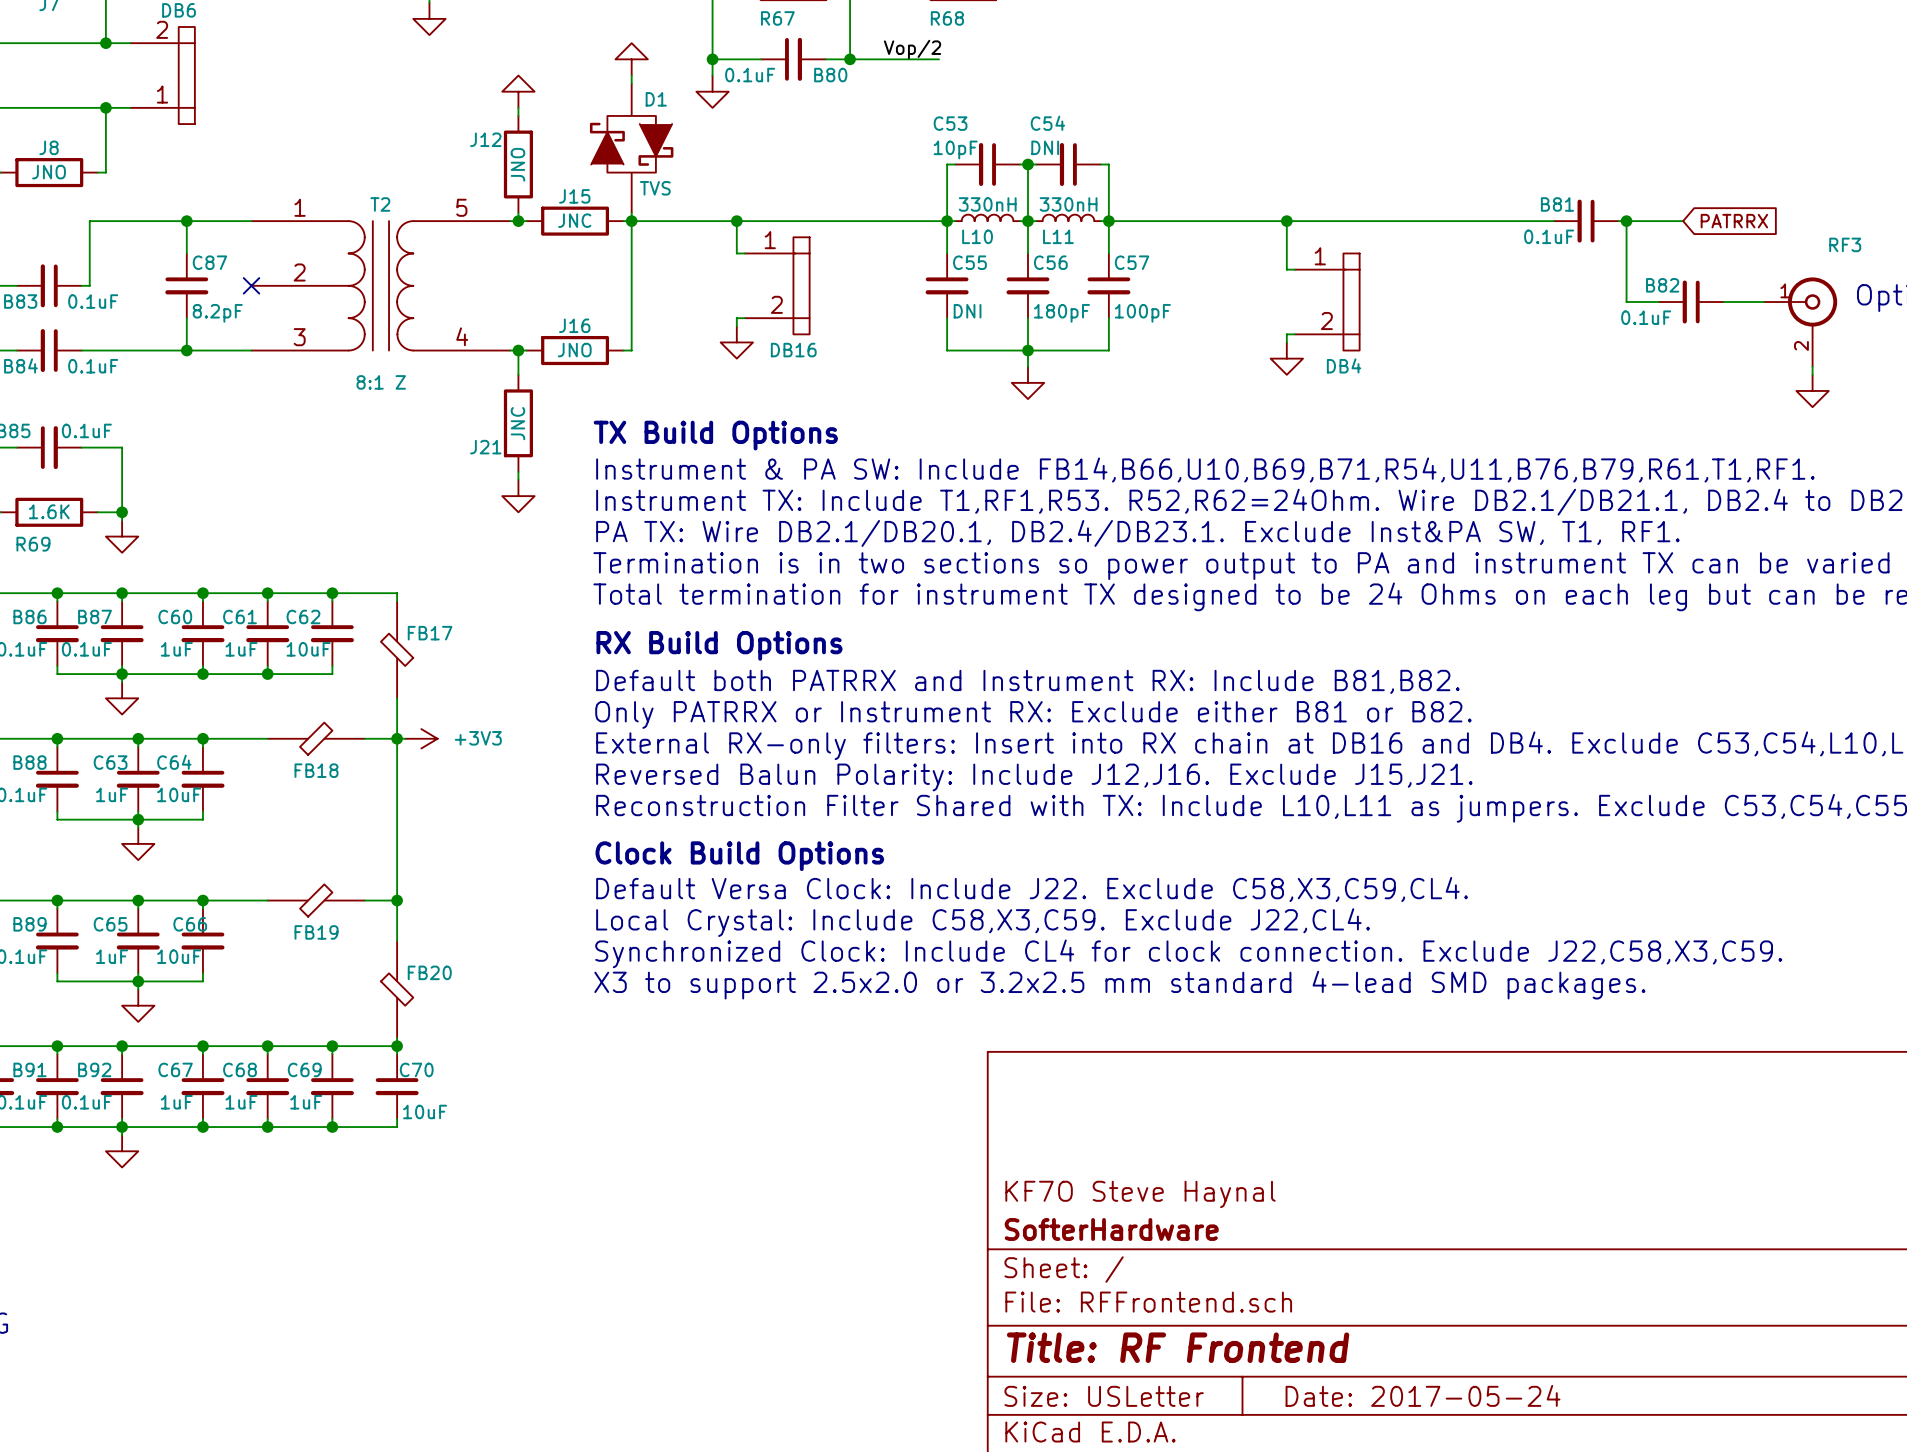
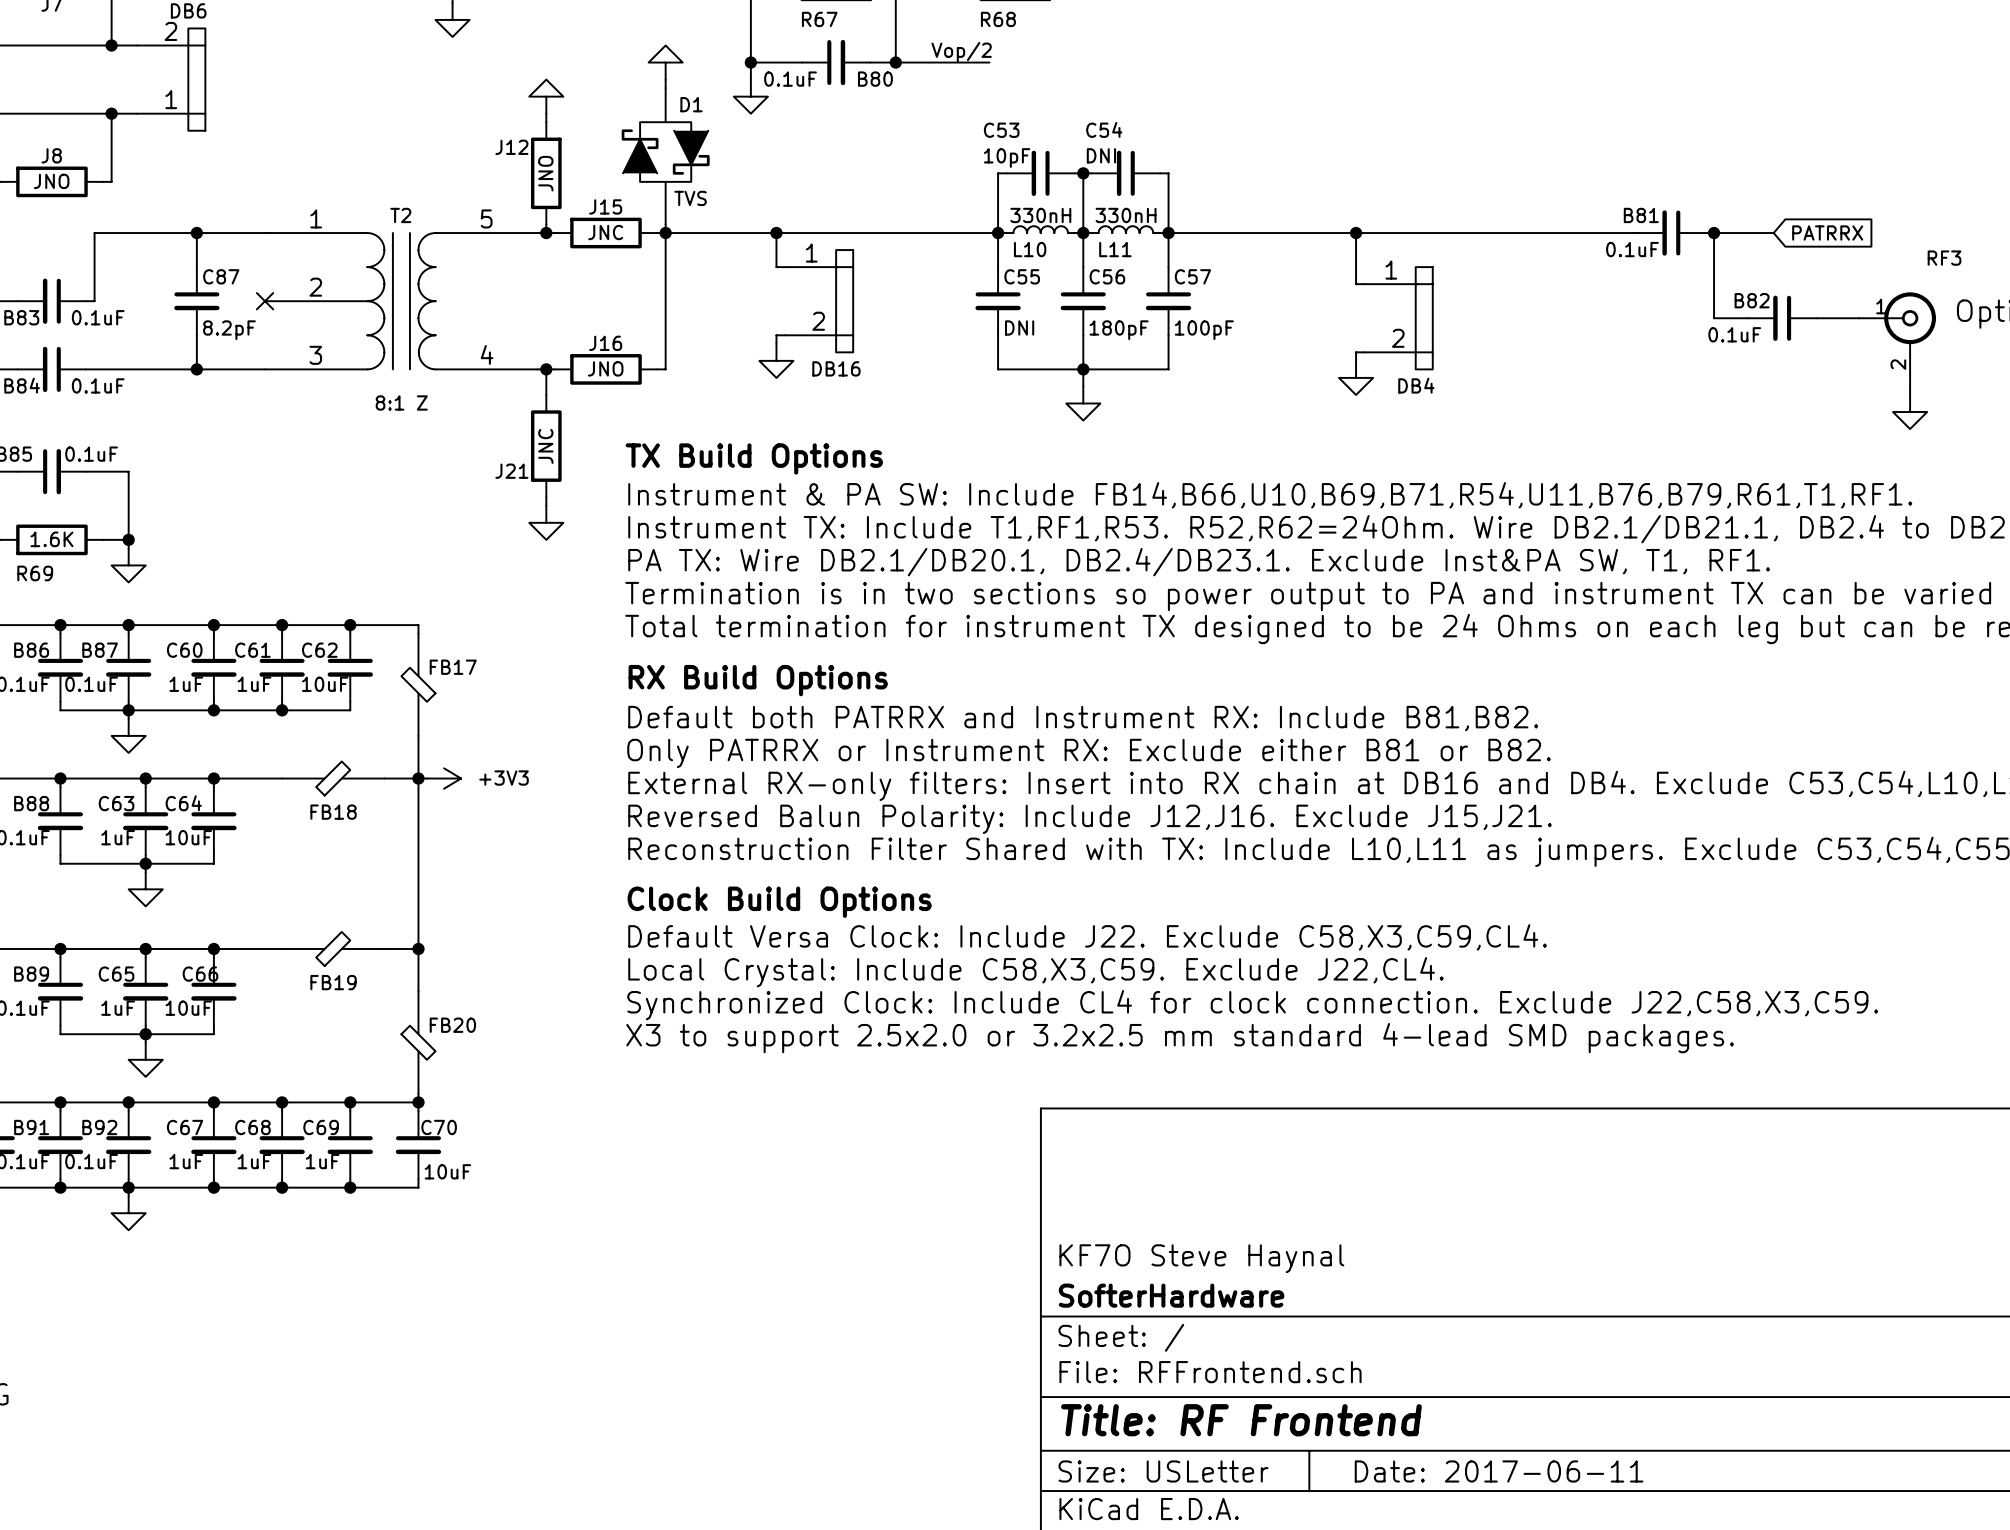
title block: Date: 2017-05-24 (1423, 1395) -> Date: 2017-06-11 (1499, 1471)

